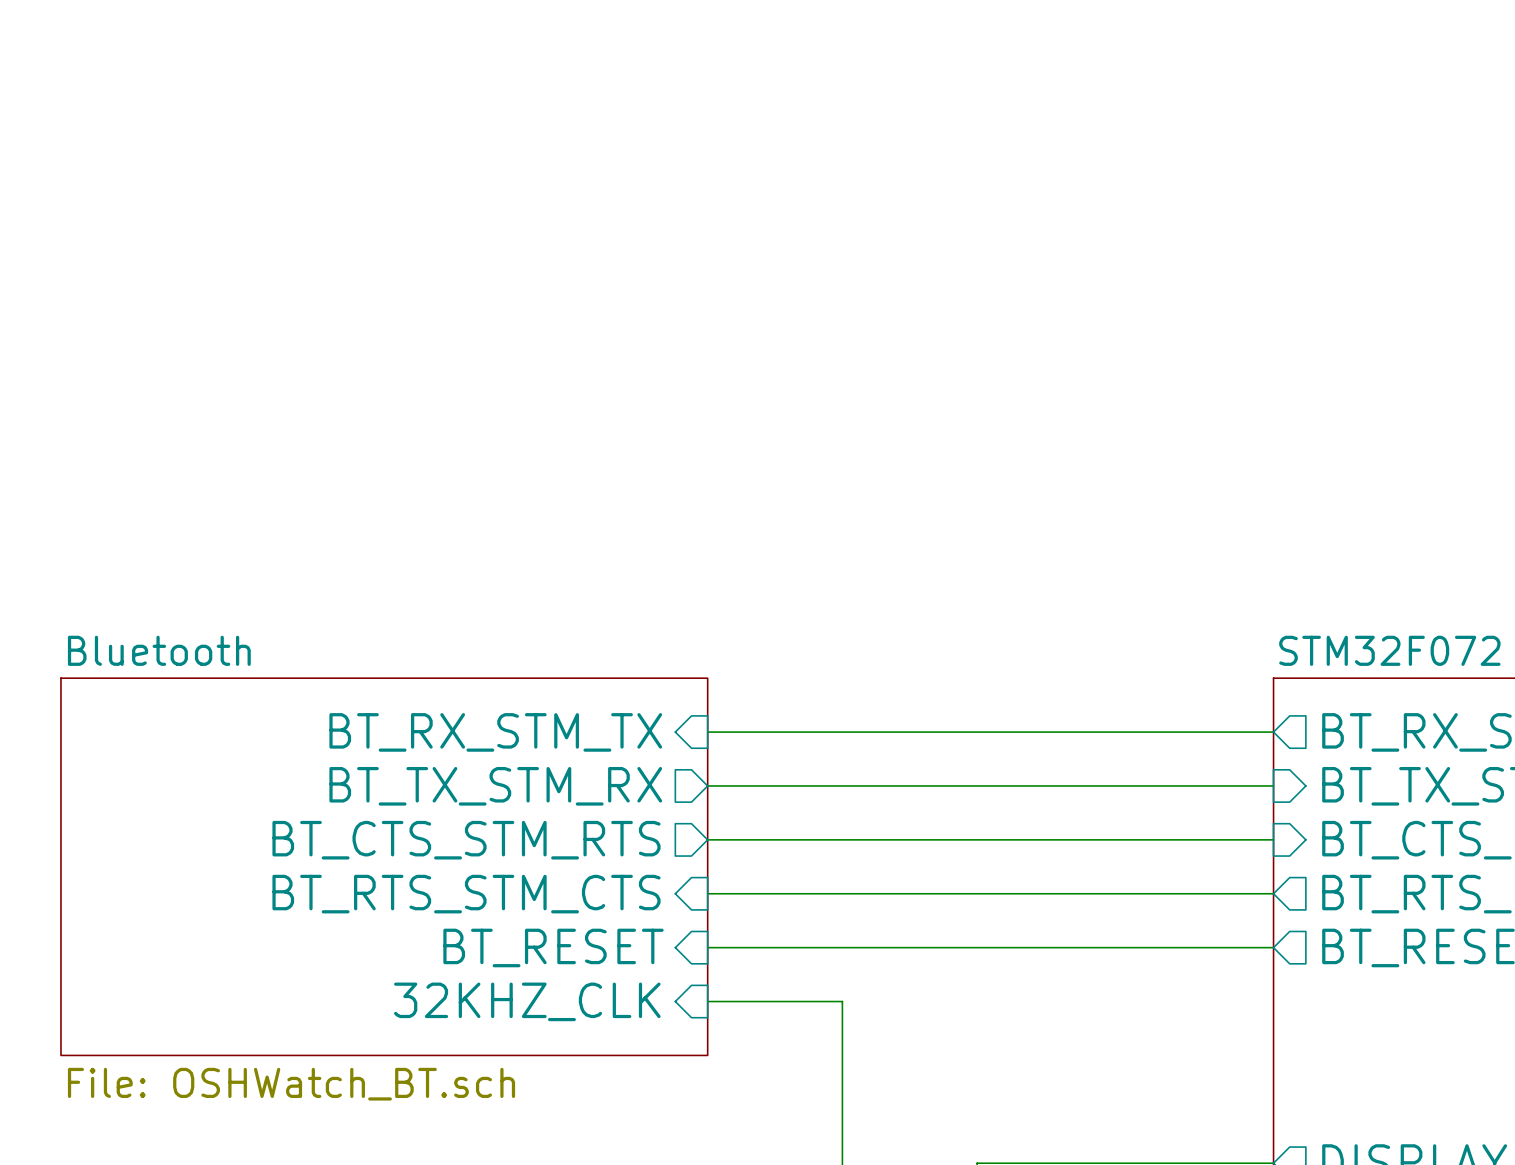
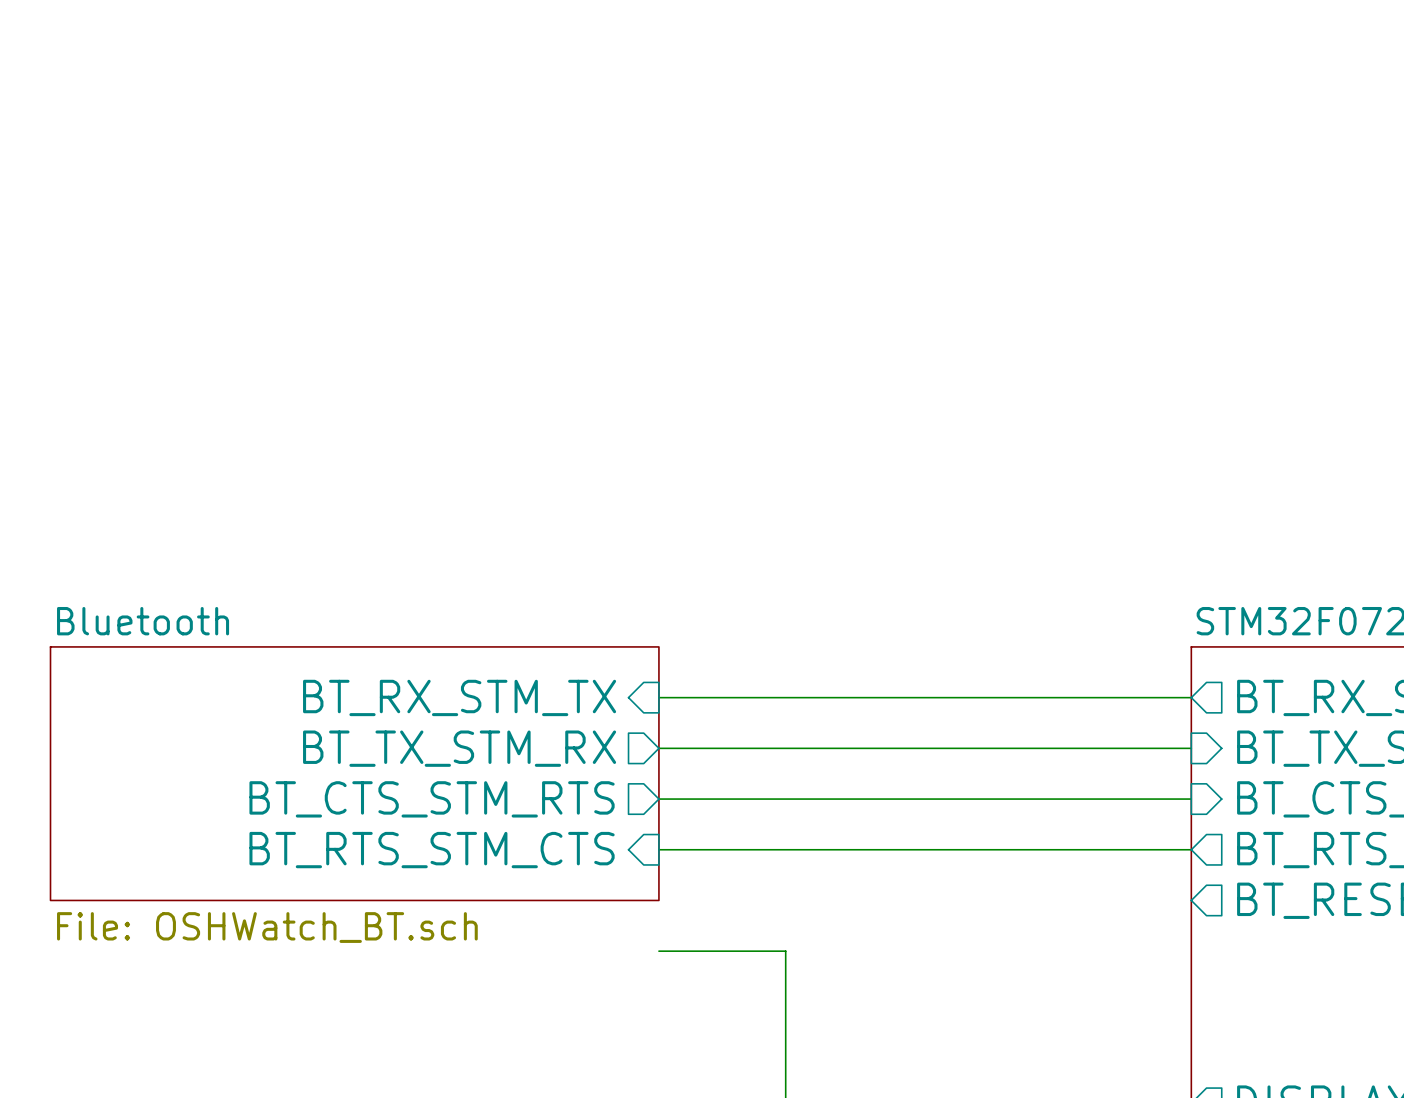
sheet Bluetooth: none -> File: OSHWatch_BT.sch (354, 773)
sheet Bluetooth: File: OSHWatch_BT.sch (384, 866) -> none
sheet pin: BT_RESET (553, 947) -> none
wire: (707, 947) (1273, 947) -> none
sheet pin: 32KHZ_CLK (527, 1001) -> none

